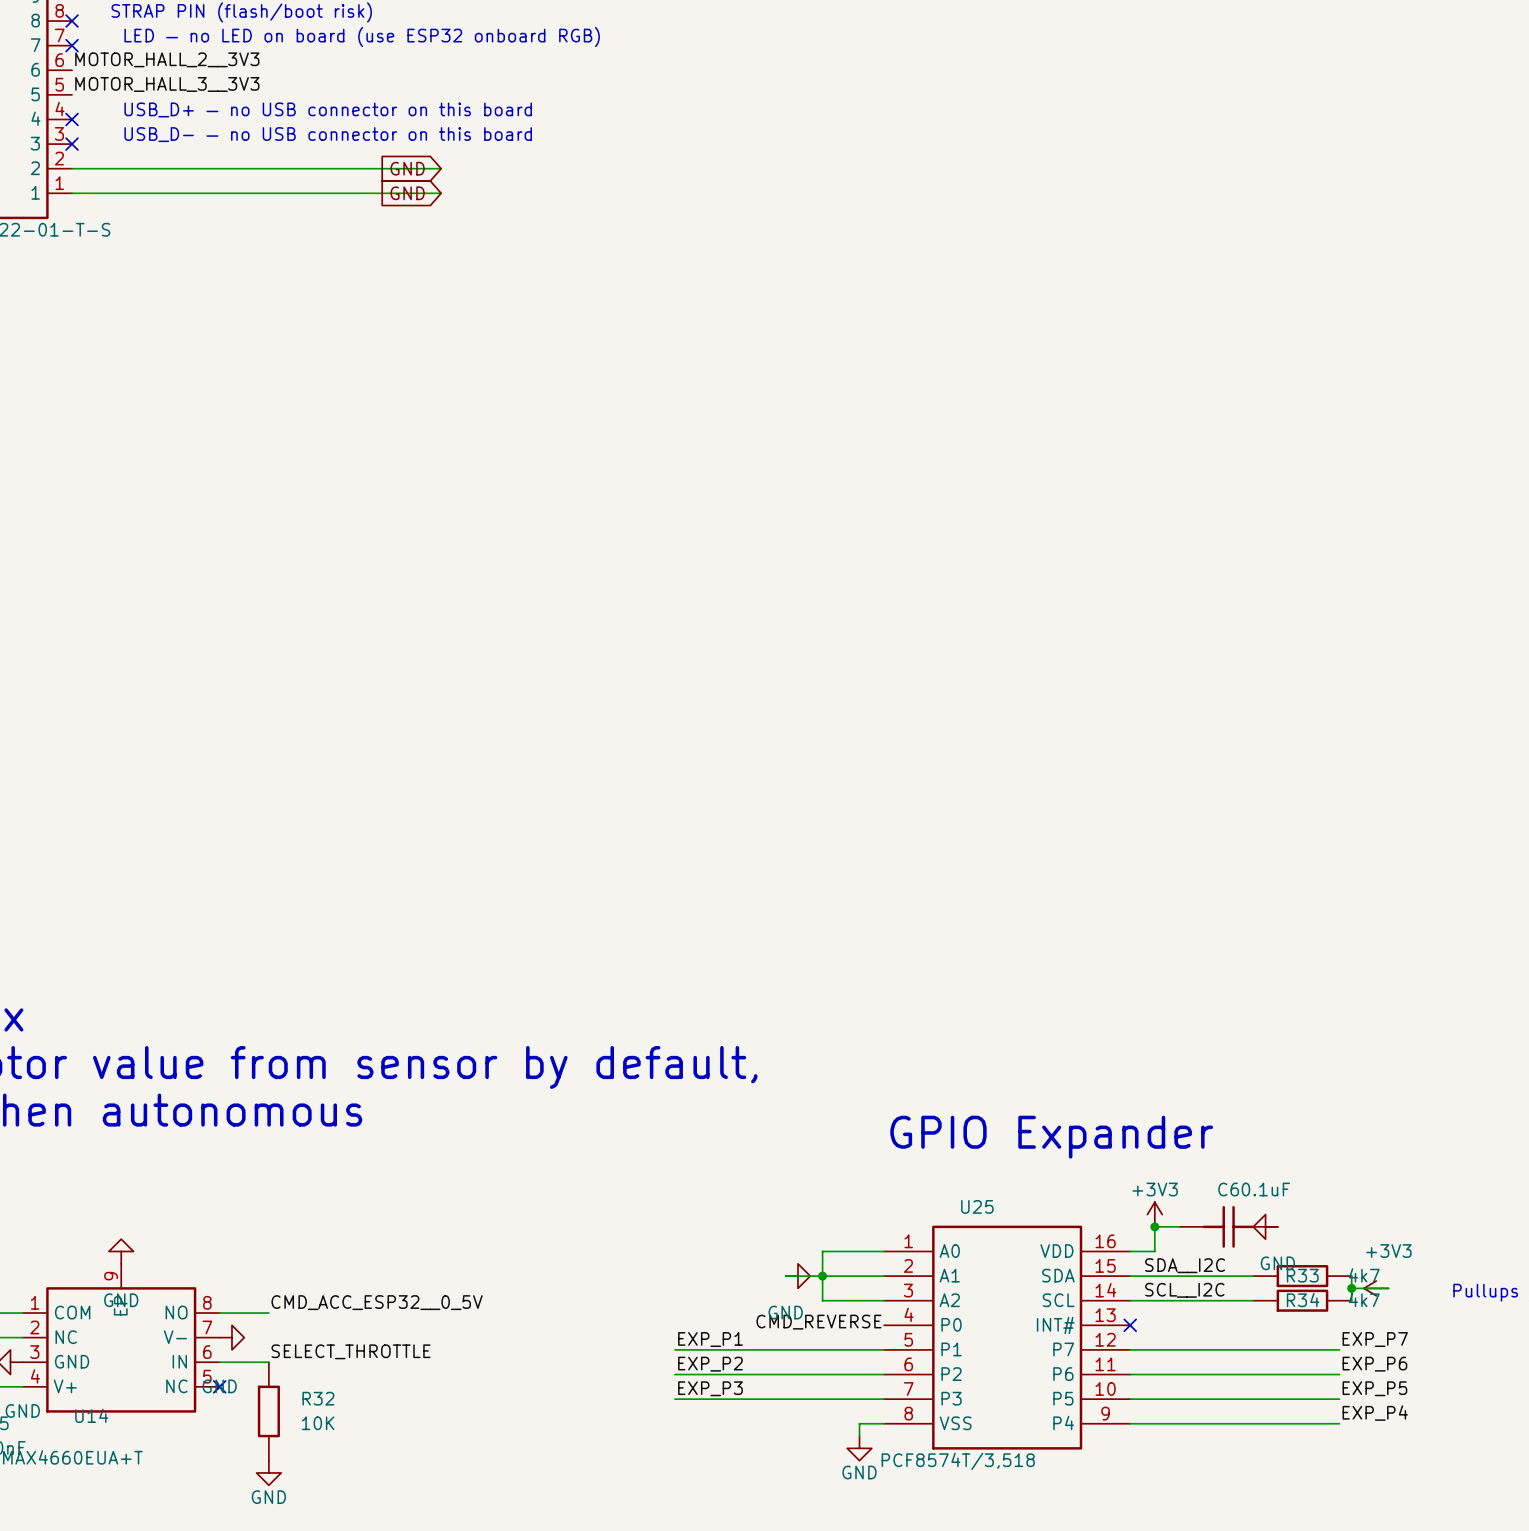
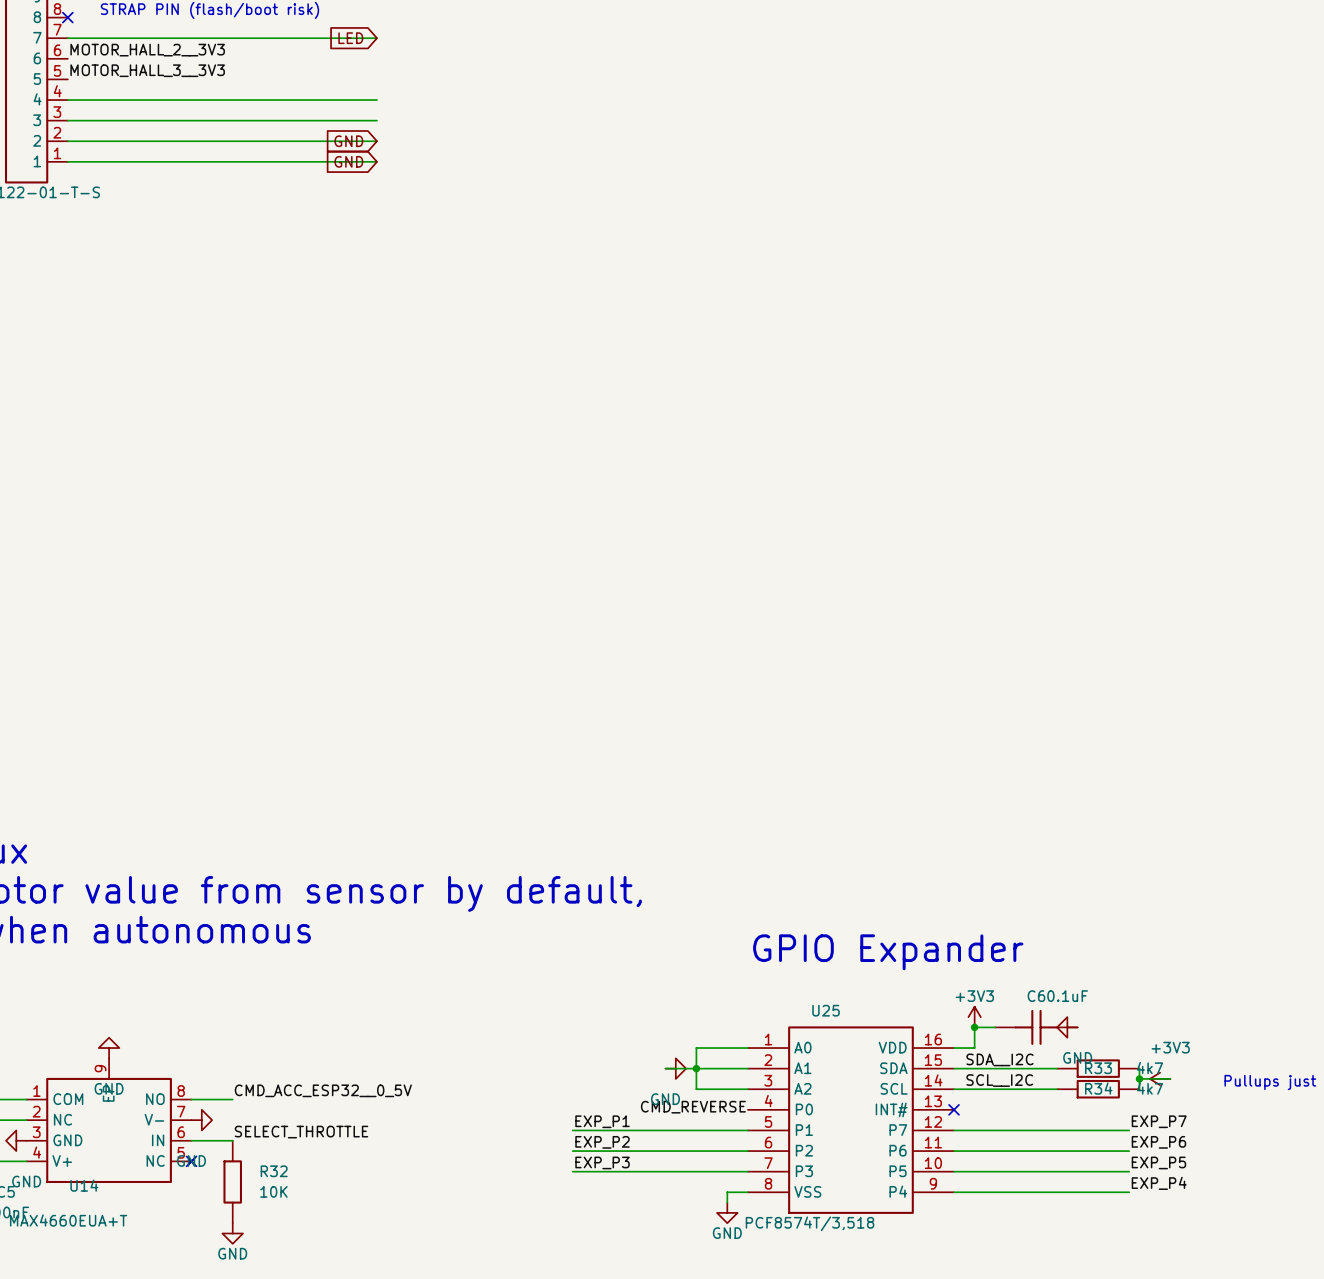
text: LED — no LED on board (use ESP32 onboard RGB) (362, 37) -> none
wire: none -> (67, 38) (376, 38)
no-connect mark: (72, 45) -> none
global label: none -> LED (350, 38)
text: USB_D+ — no USB connector on this board (328, 109) -> none
wire: none -> (67, 100) (376, 100)
no-connect mark: (72, 119) -> none
text: USB_D- — no USB connector on this board (328, 134) -> none
wire: none -> (67, 120) (376, 120)
no-connect mark: (72, 144) -> none

